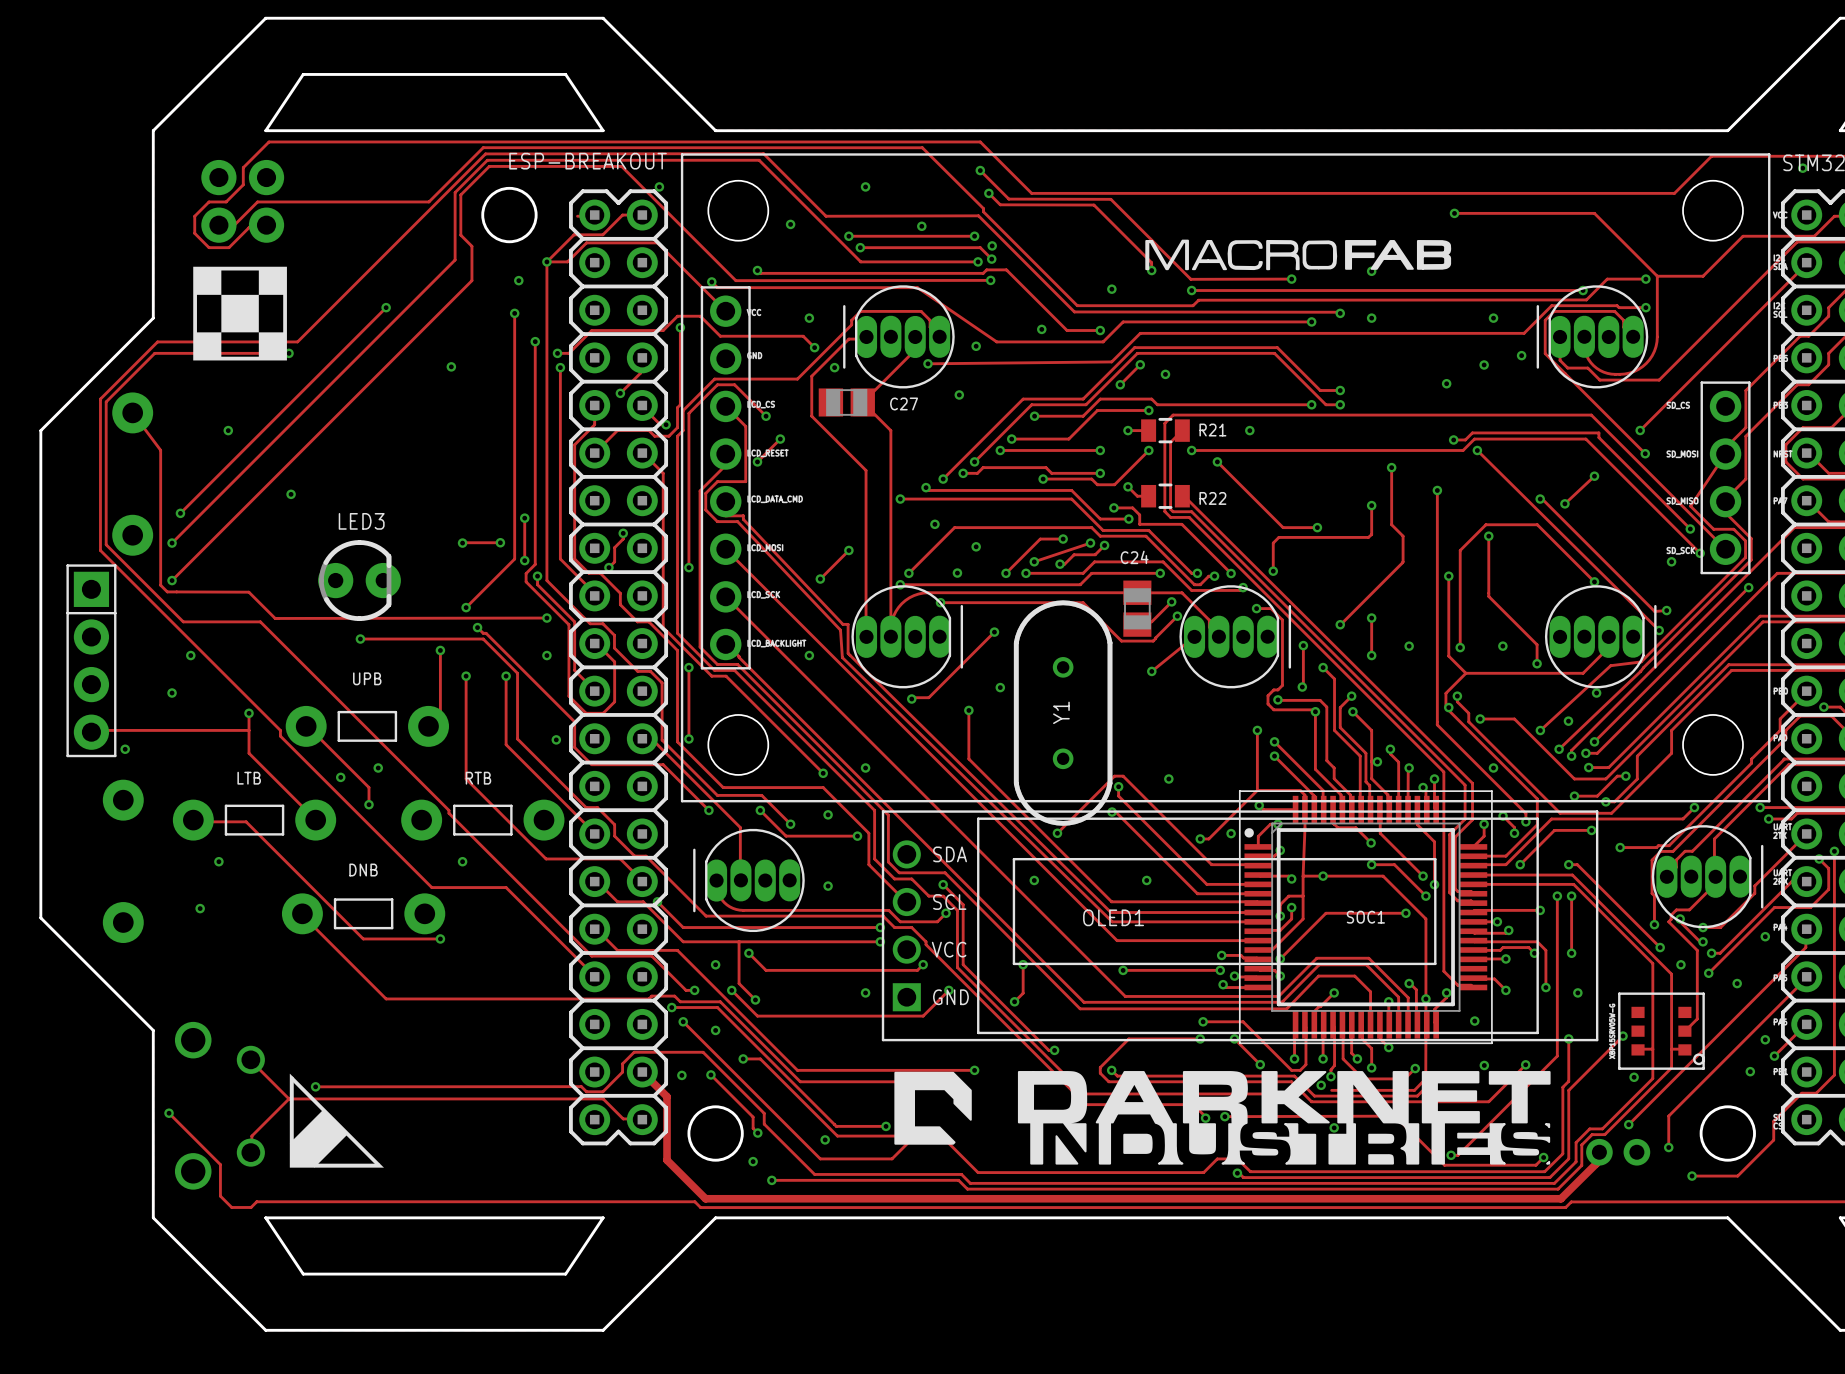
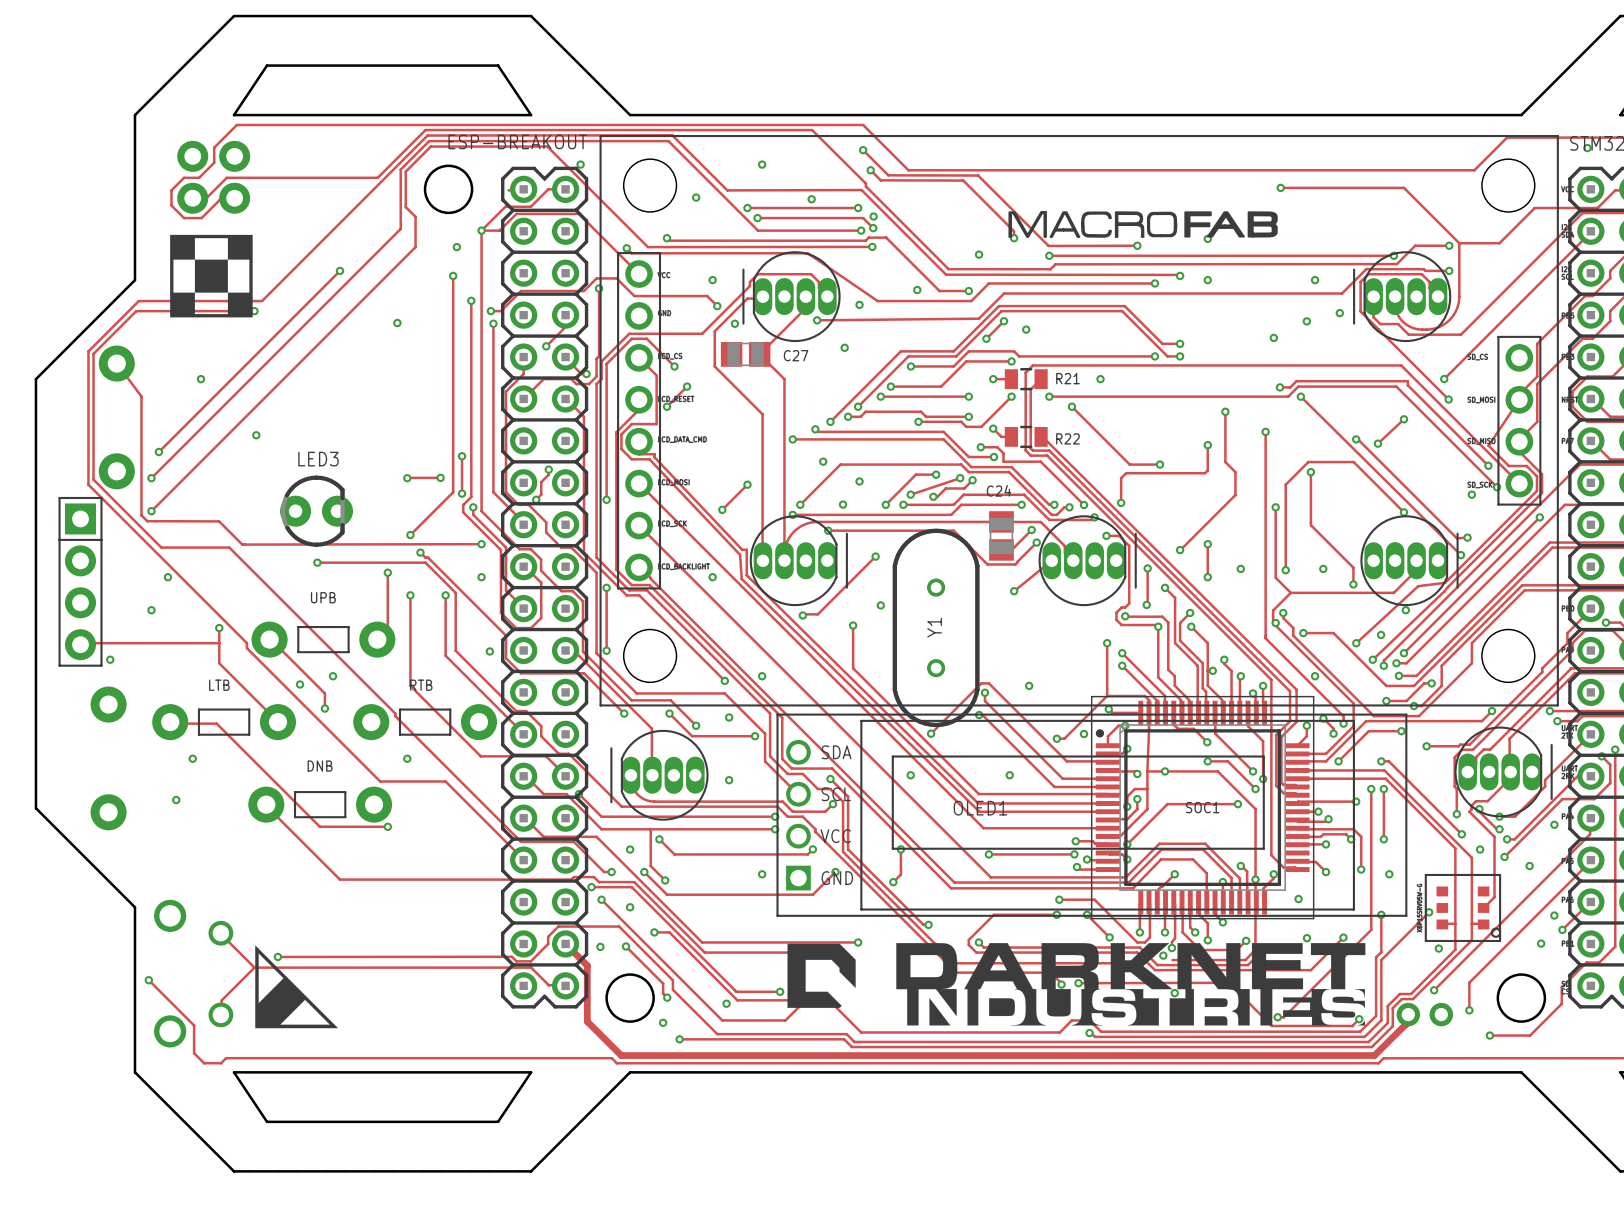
drawing shape: [894, 1071, 1551, 1165] -> [787, 943, 1366, 1026]

